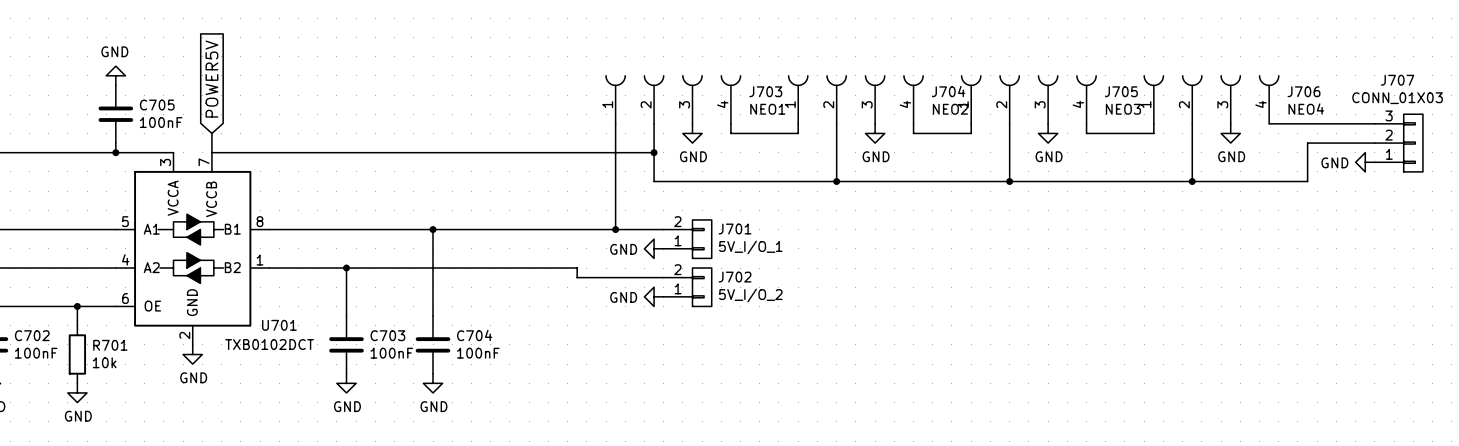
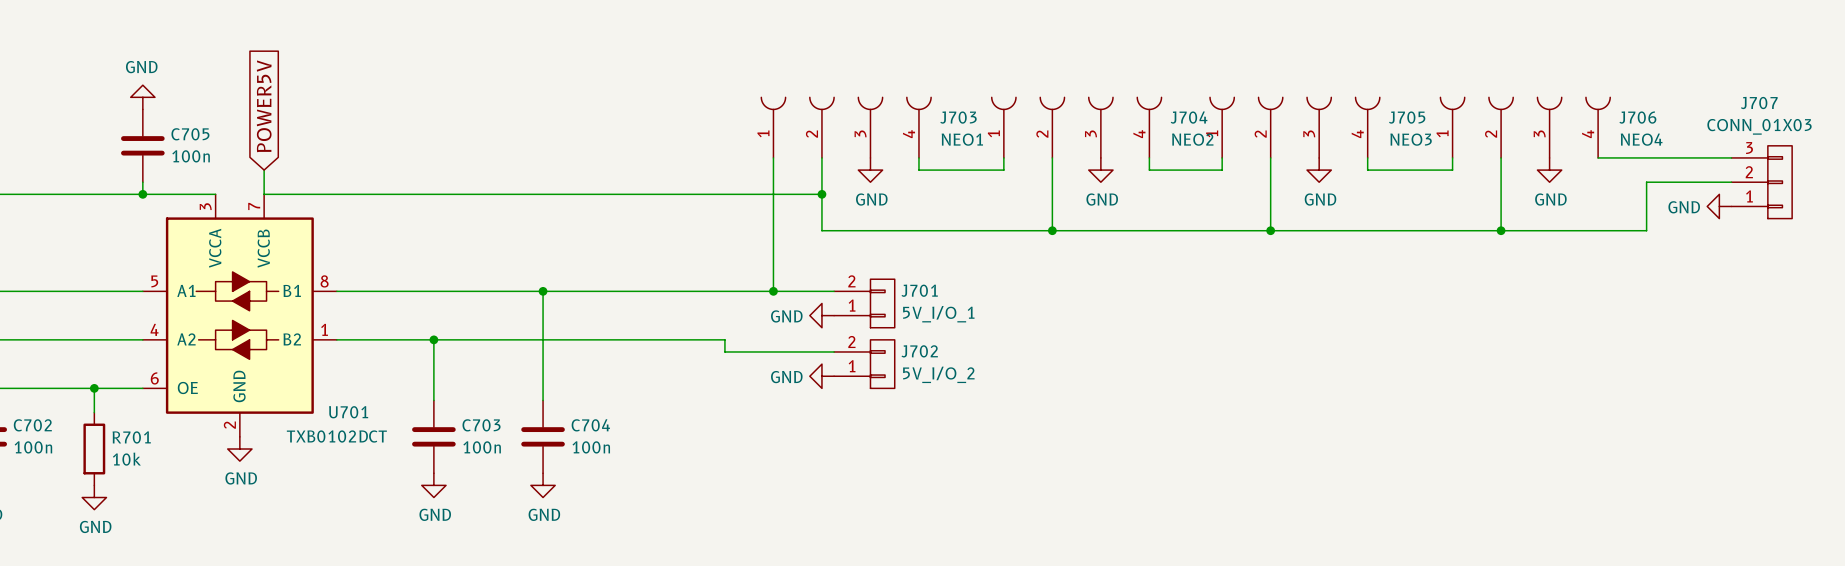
C705 value: 100nF (161, 122) -> 100n (191, 156)
C702 value: 100nF (36, 353) -> 100n (33, 447)
C703 value: 100nF (391, 353) -> 100n (482, 447)
C704 value: 100nF (478, 353) -> 100n (591, 447)

